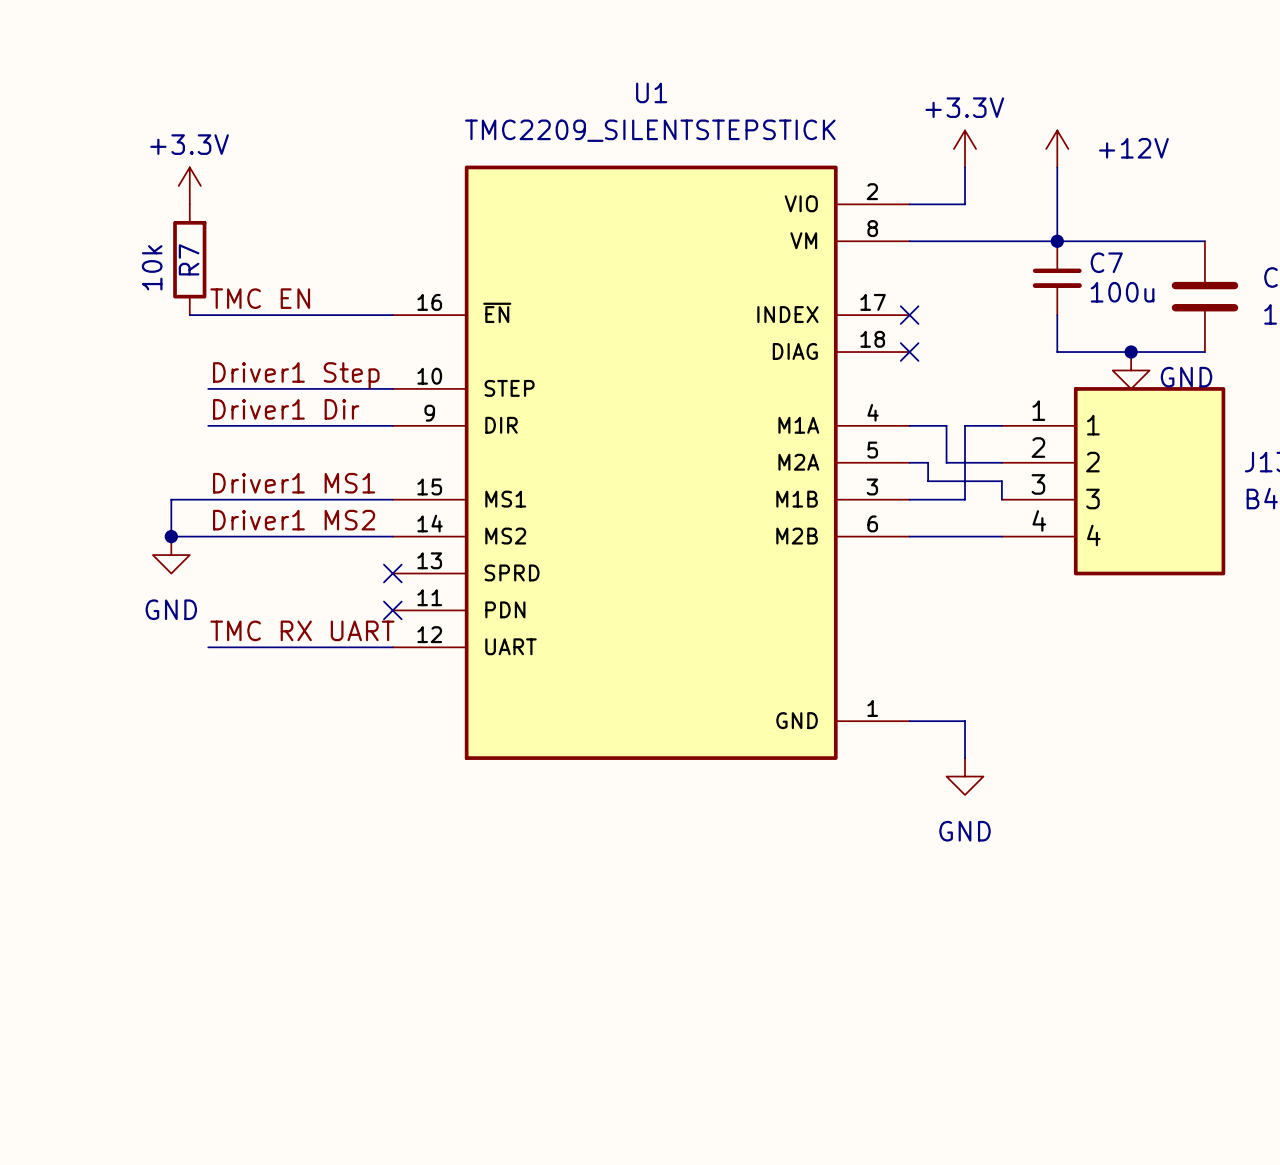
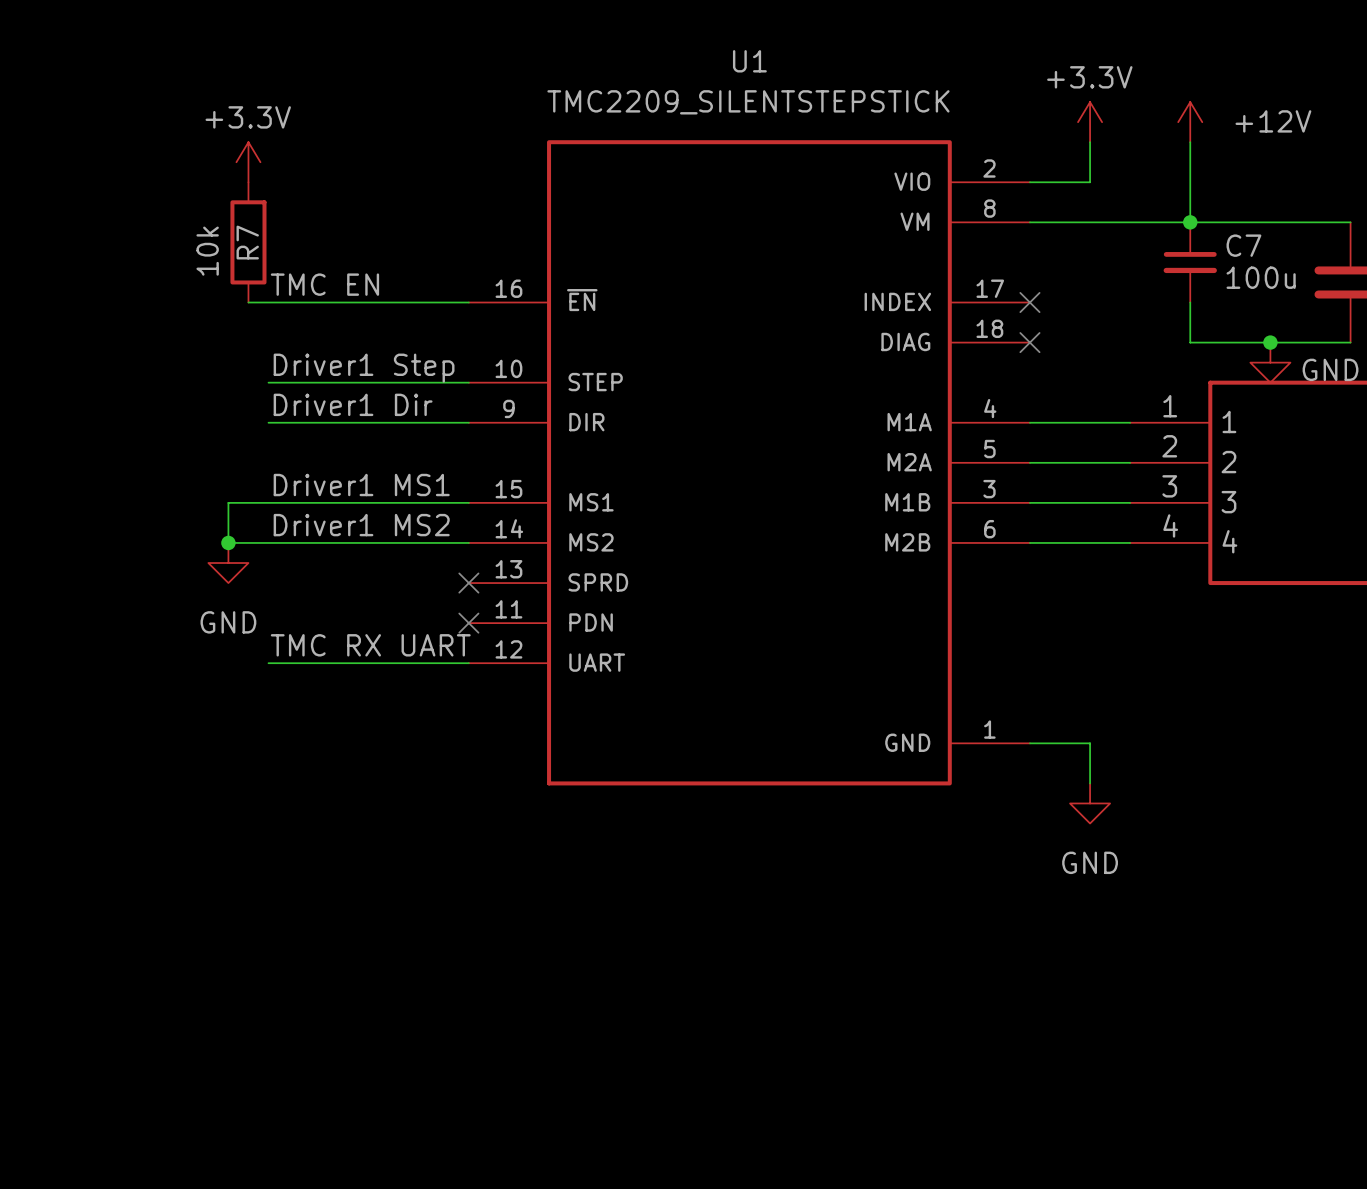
wire: (946, 425) (946, 462) -> (1070, 422) (1090, 422)
wire: (965, 425) (965, 499) -> none
wire: (928, 462) (928, 481) (1001, 481) (1001, 499) -> (1090, 502) (1130, 502)
wire: none -> (1049, 462) (1070, 462)

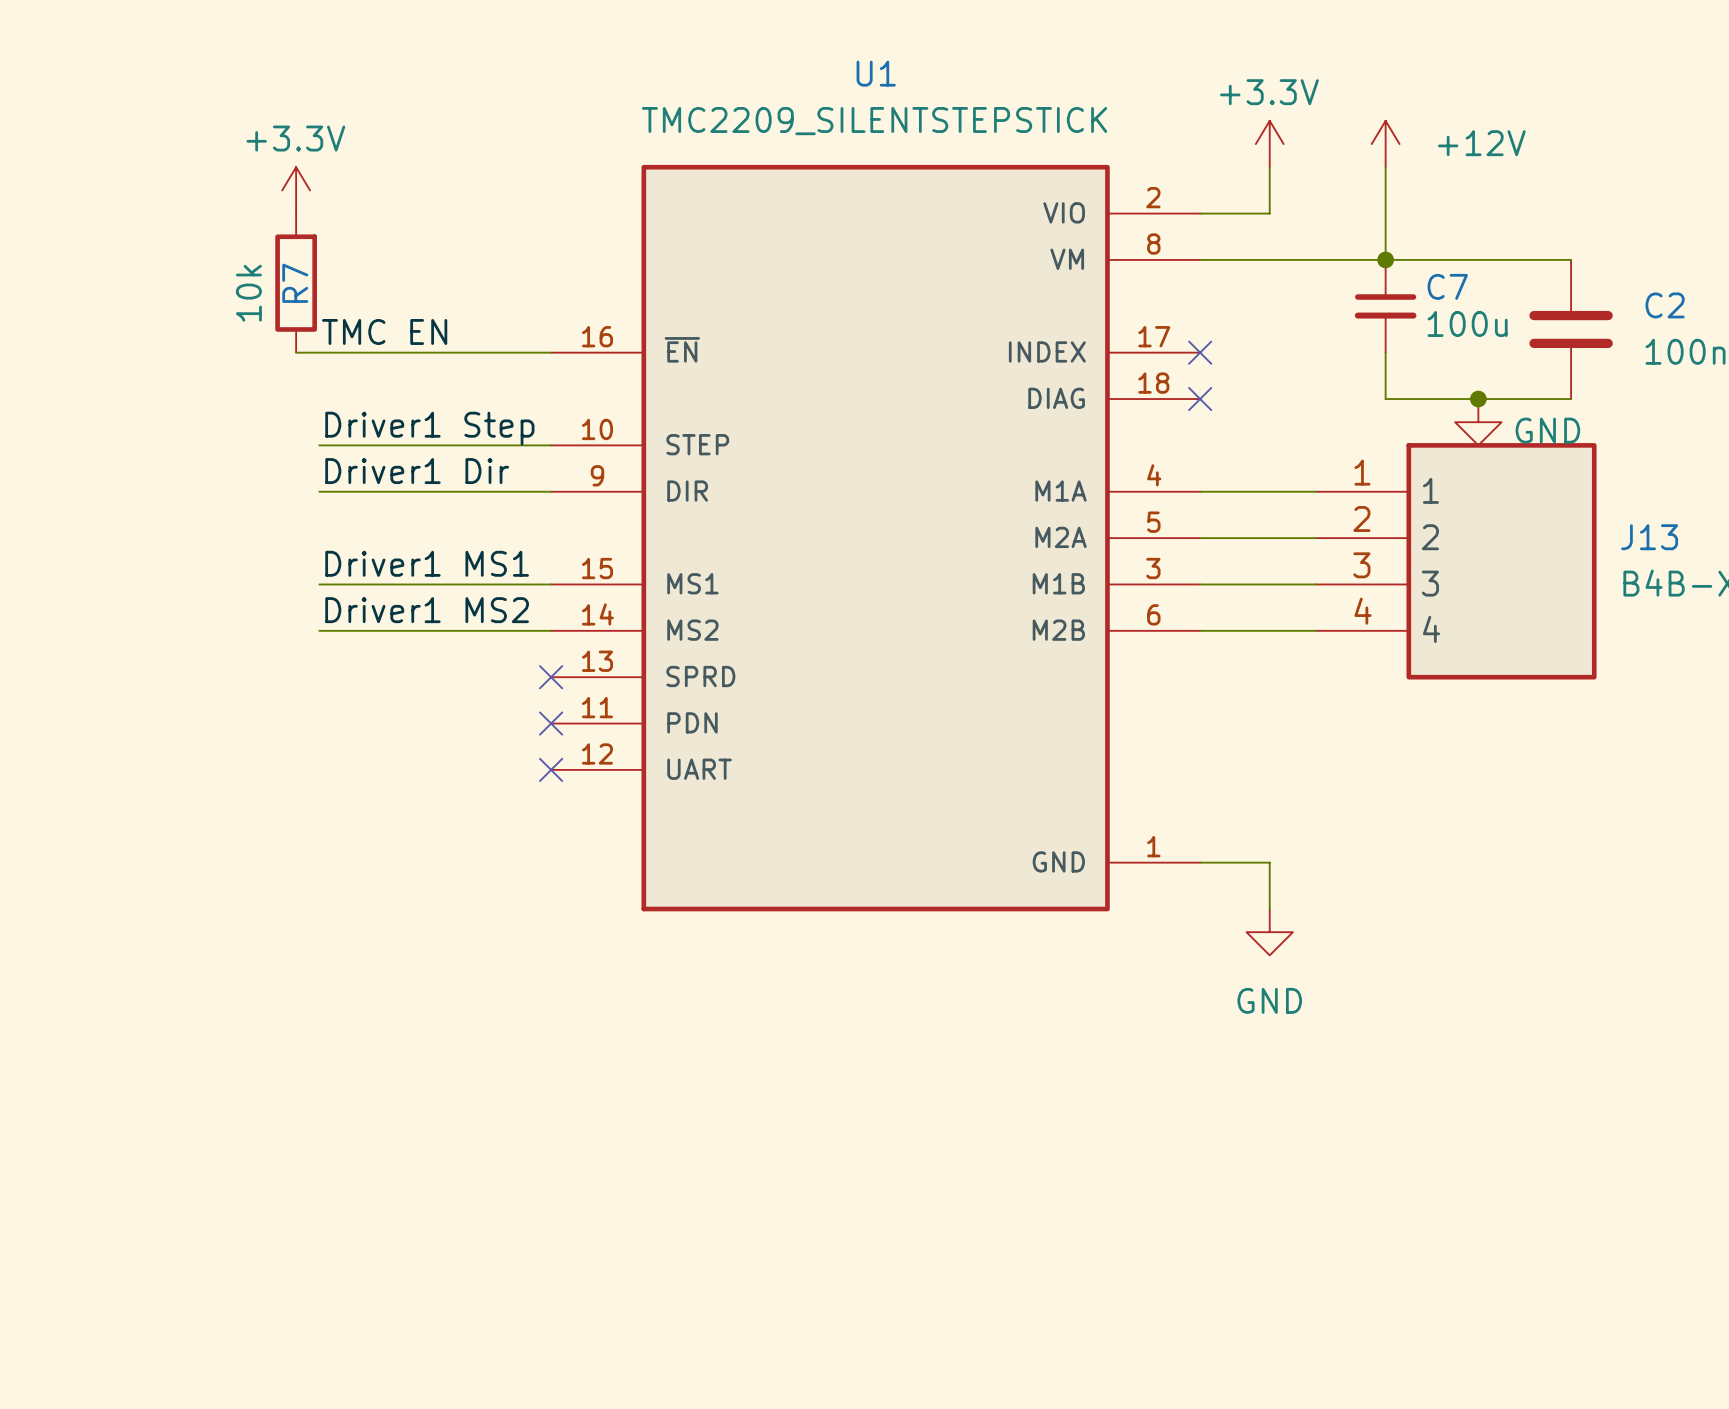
wire: (268, 502) (228, 502) (228, 542) (268, 542) -> none
junction: (228, 542) -> none
power symbol: GND (228, 563) -> none
label: TMC RX UART (370, 645) -> none
wire: (268, 663) (468, 663) -> none
no-connect mark: none -> (551, 769)

